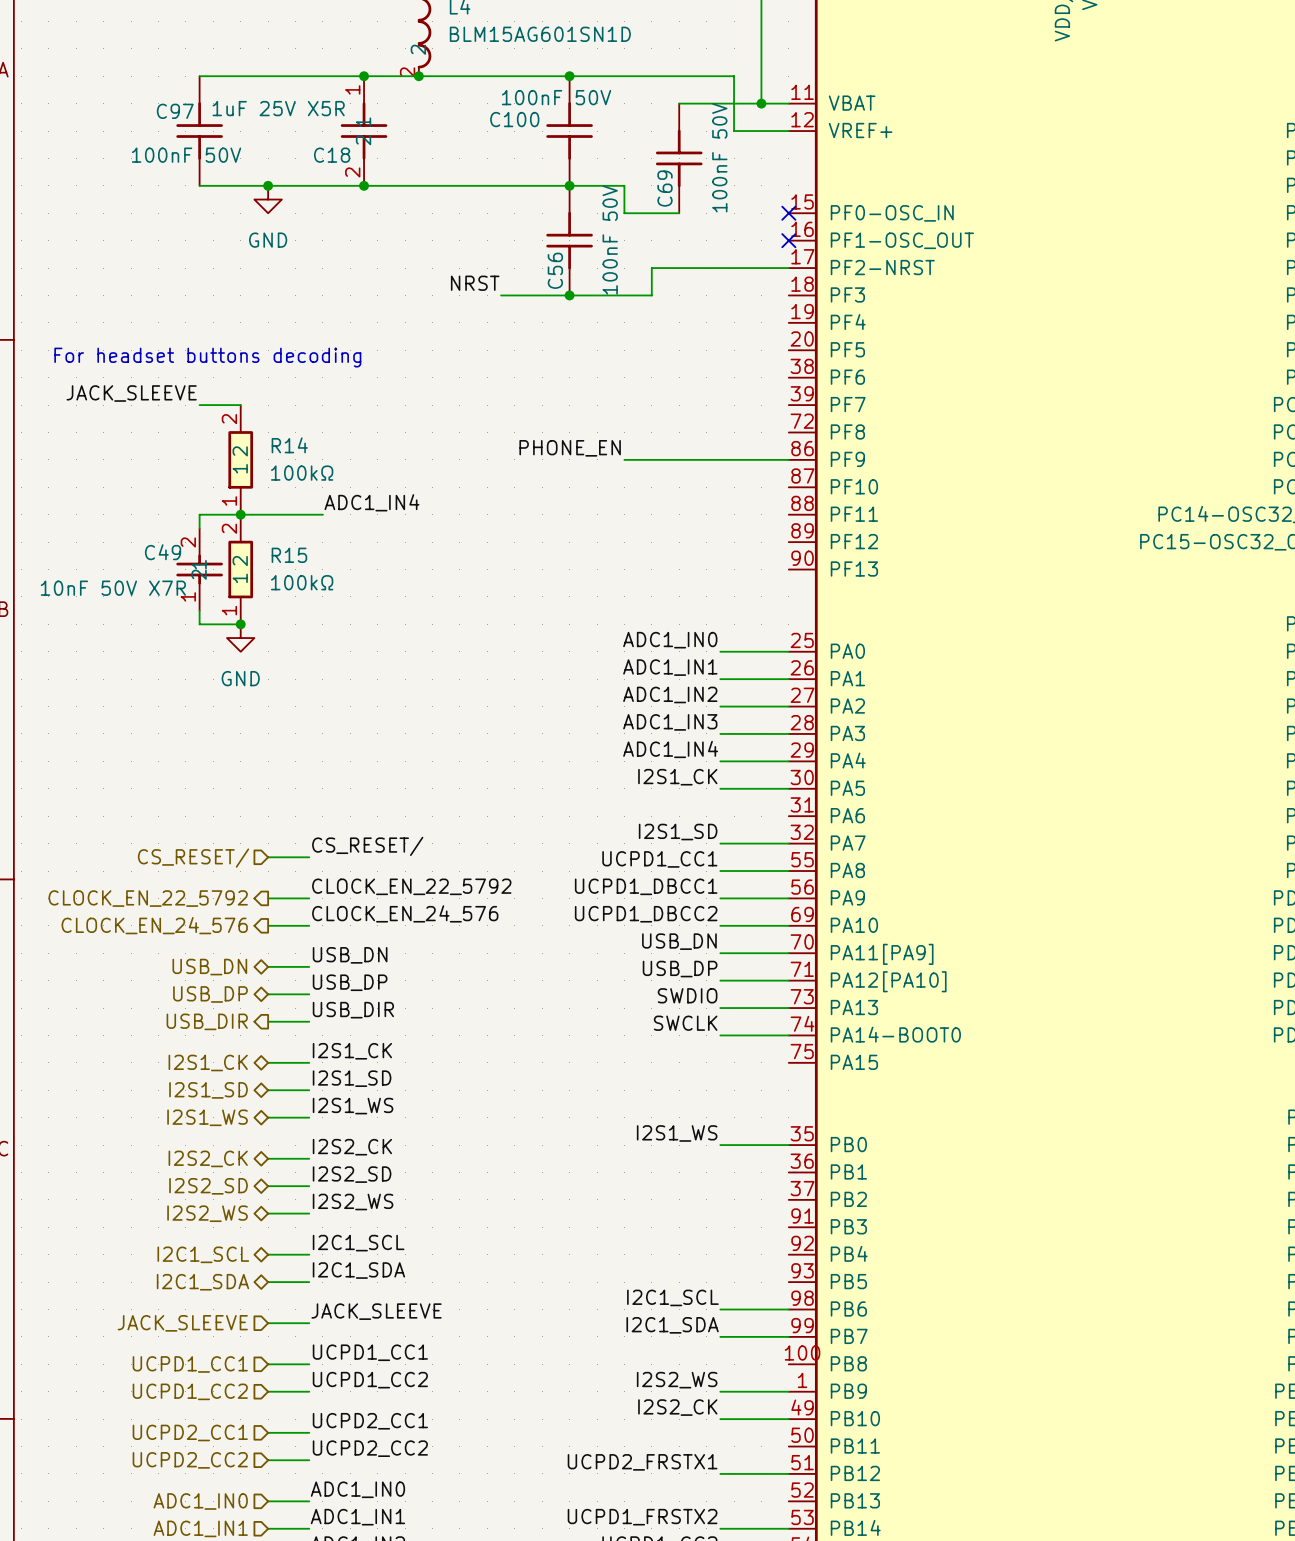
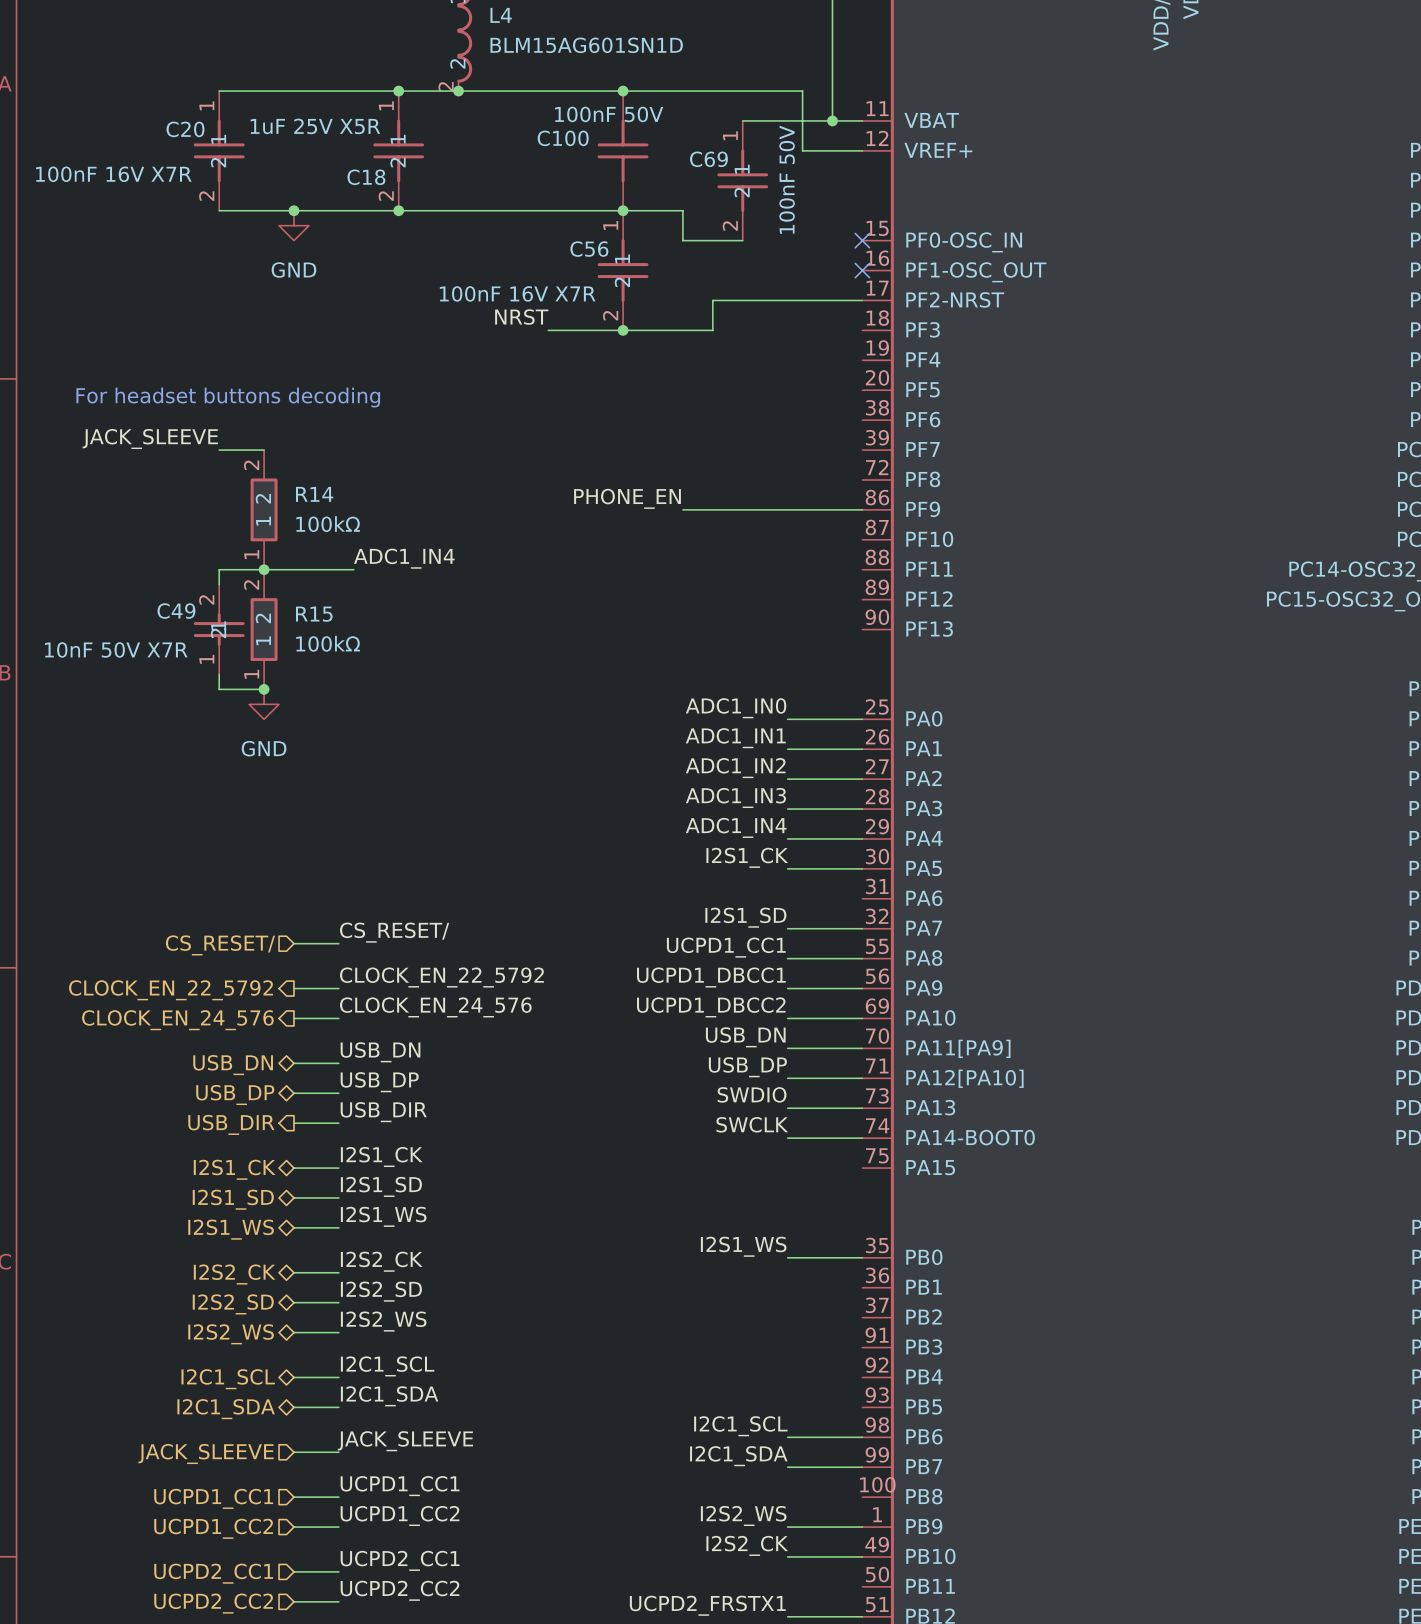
C97 pin number: none -> 1 (206, 105)
C97 name: C97 (175, 111) -> C20 (185, 129)
C69 pin number: none -> 1 (730, 135)
C97 pin name: none -> 1 (218, 139)
C97 pin name: none -> 2 (218, 162)
C69 pin name: none -> 1 (742, 169)
C97 value: 100nF 50V (186, 155) -> 100nF 16V X7R (113, 174)
C69 pin name: none -> 2 (742, 192)
C97 pin number: none -> 2 (206, 196)
C69 name rotation: 0° (665, 188) -> 90° clockwise (708, 159)
C69 name position: C69 (665, 188) -> C69 (708, 159)
C56 pin number: none -> 1 (610, 225)
C69 pin number: none -> 2 (730, 225)
C56 pin name: none -> 1 (622, 258)
C56 value: 100nF 50V (610, 239) -> 100nF 16V X7R (517, 293)
C56 pin name: none -> 2 (622, 282)
C56 name rotation: 0° (555, 270) -> 90° clockwise (589, 249)
C56 name position: C56 (555, 270) -> C56 (589, 249)
C56 pin number: none -> 2 (610, 315)

